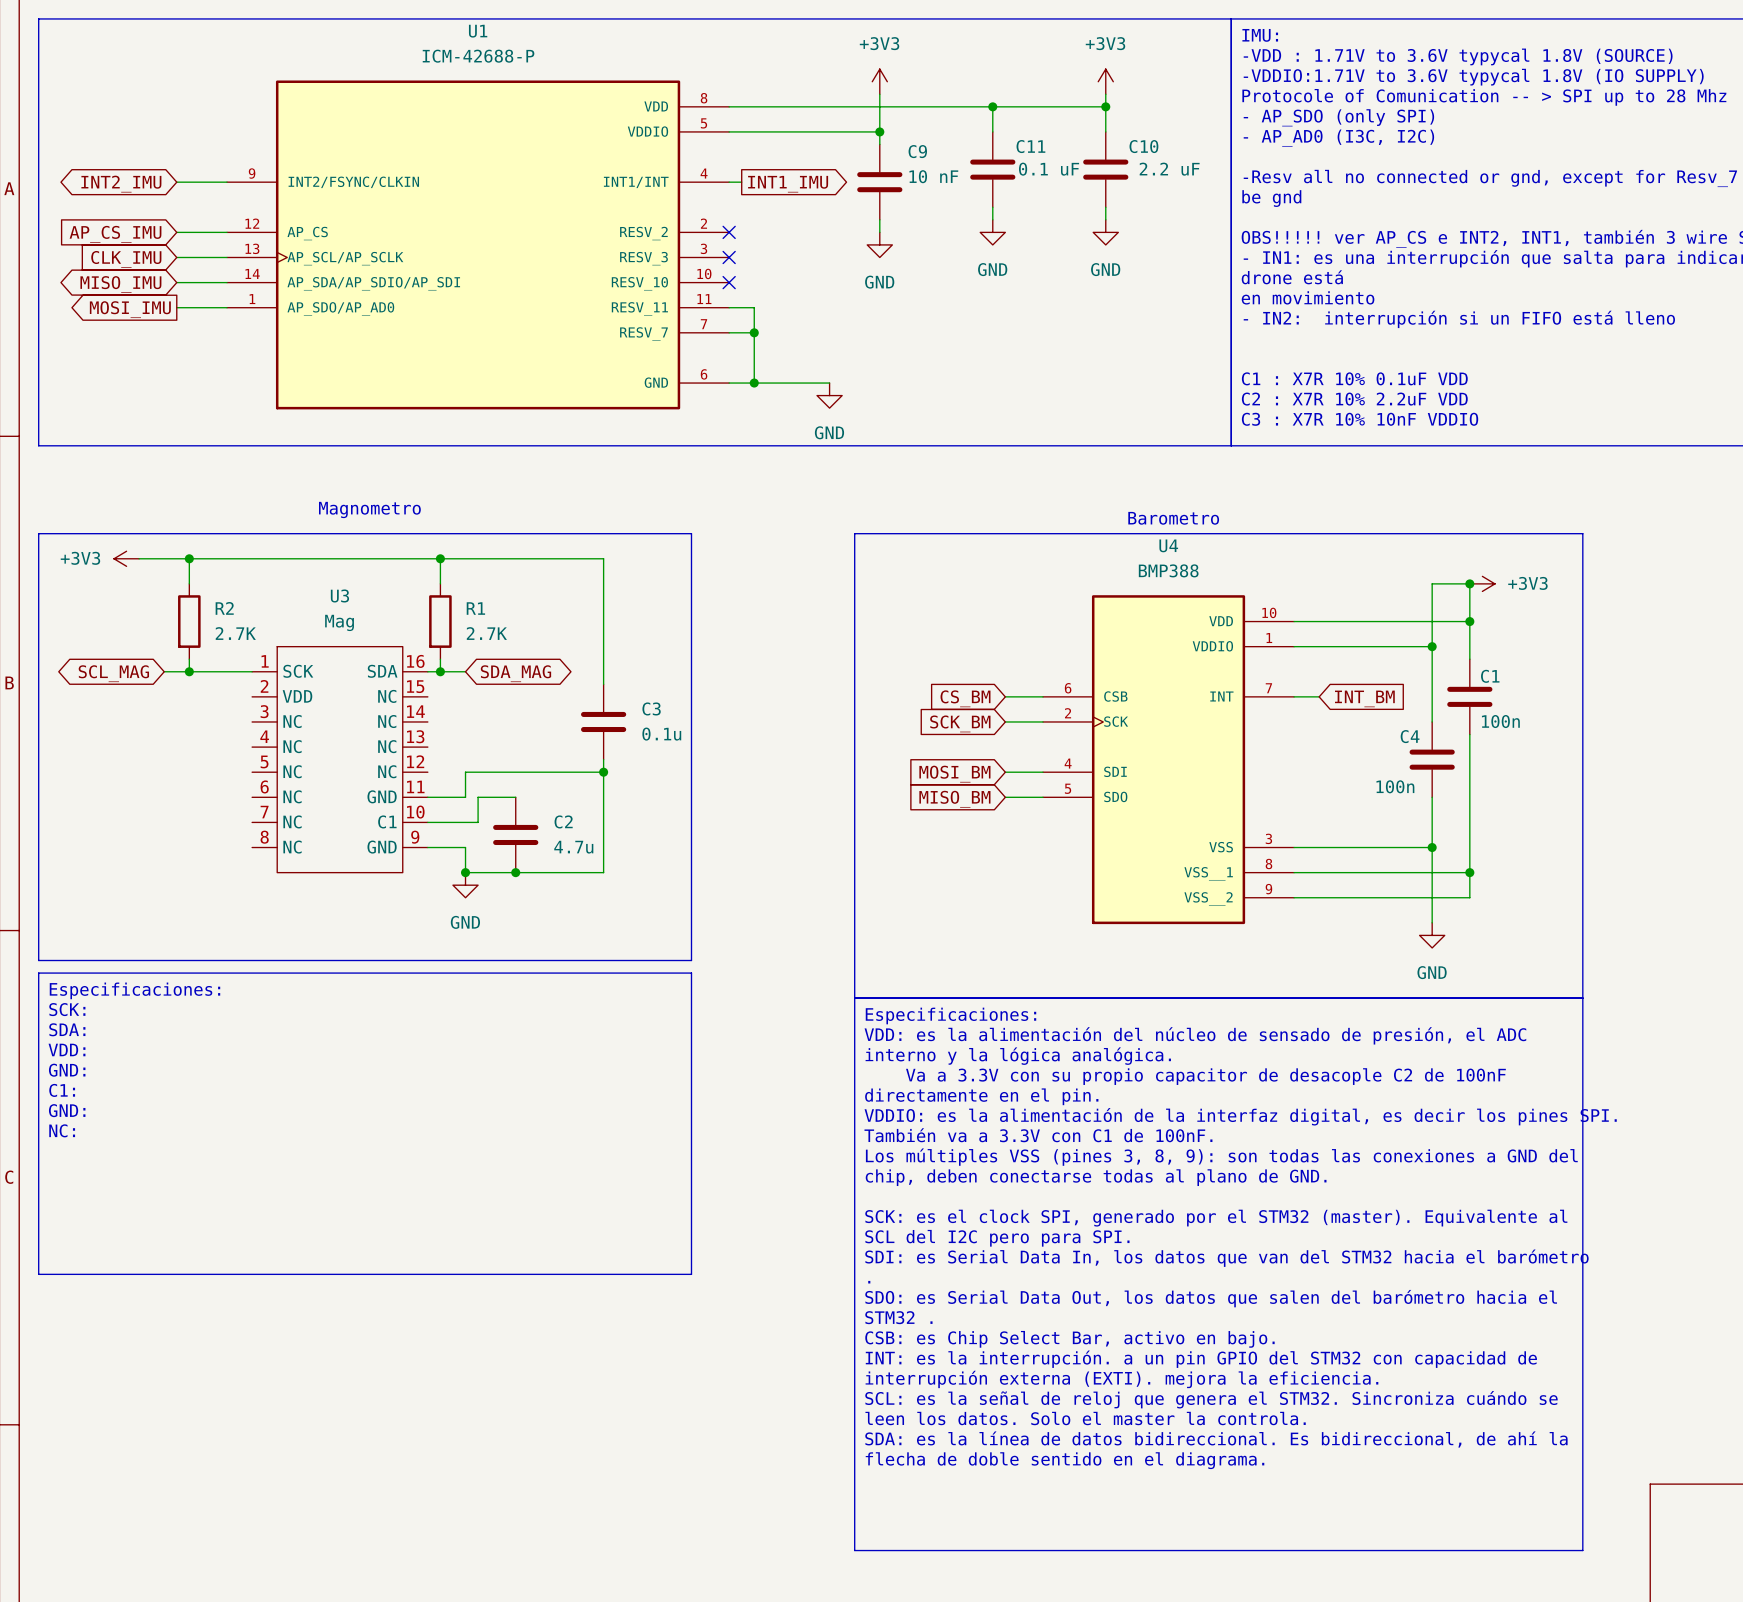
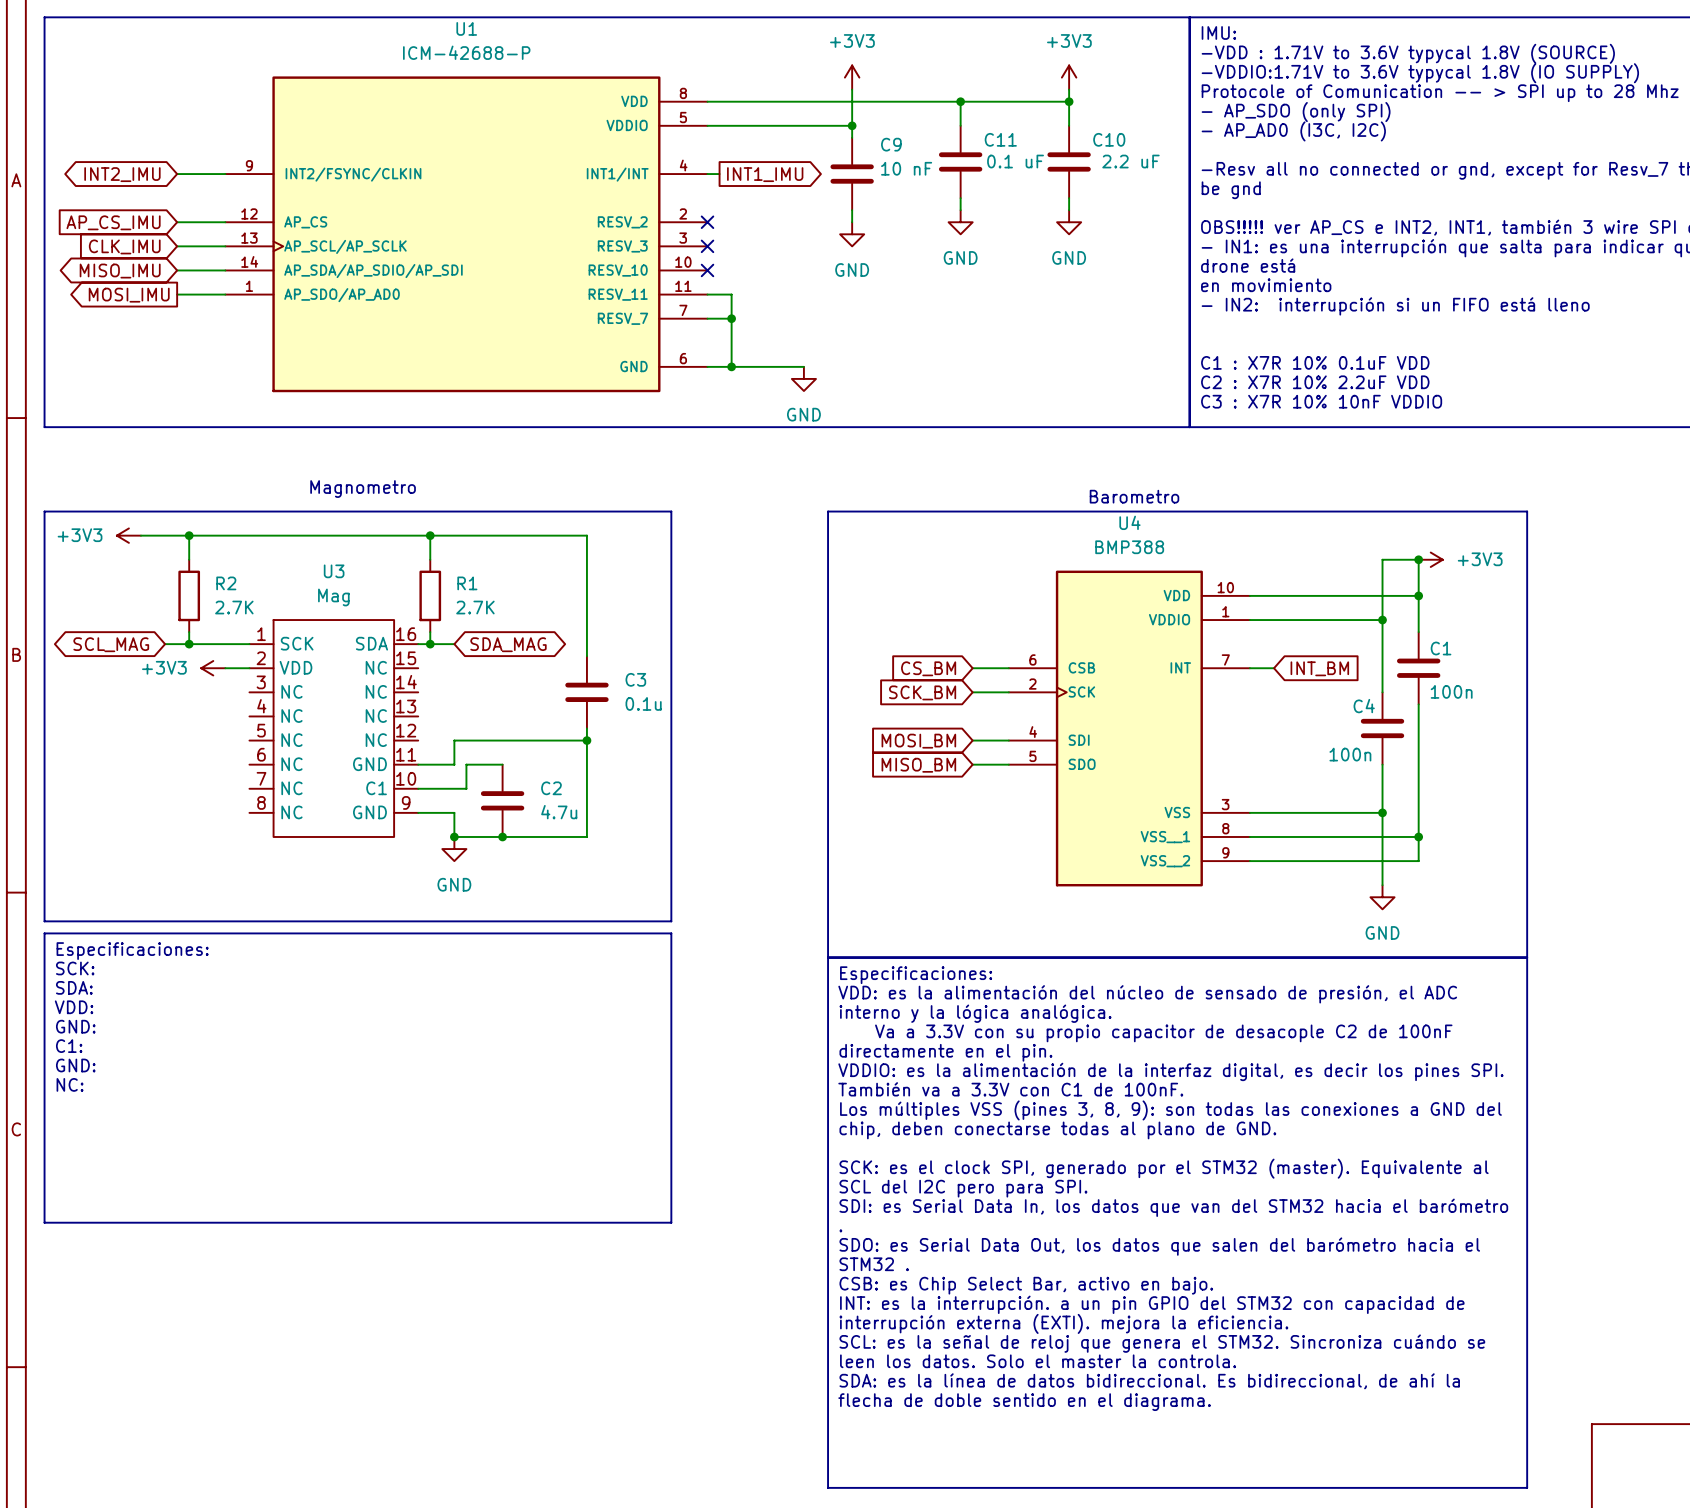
power symbol: none -> +3V3 (213, 668)
wire: none -> (225, 668) (249, 668)

